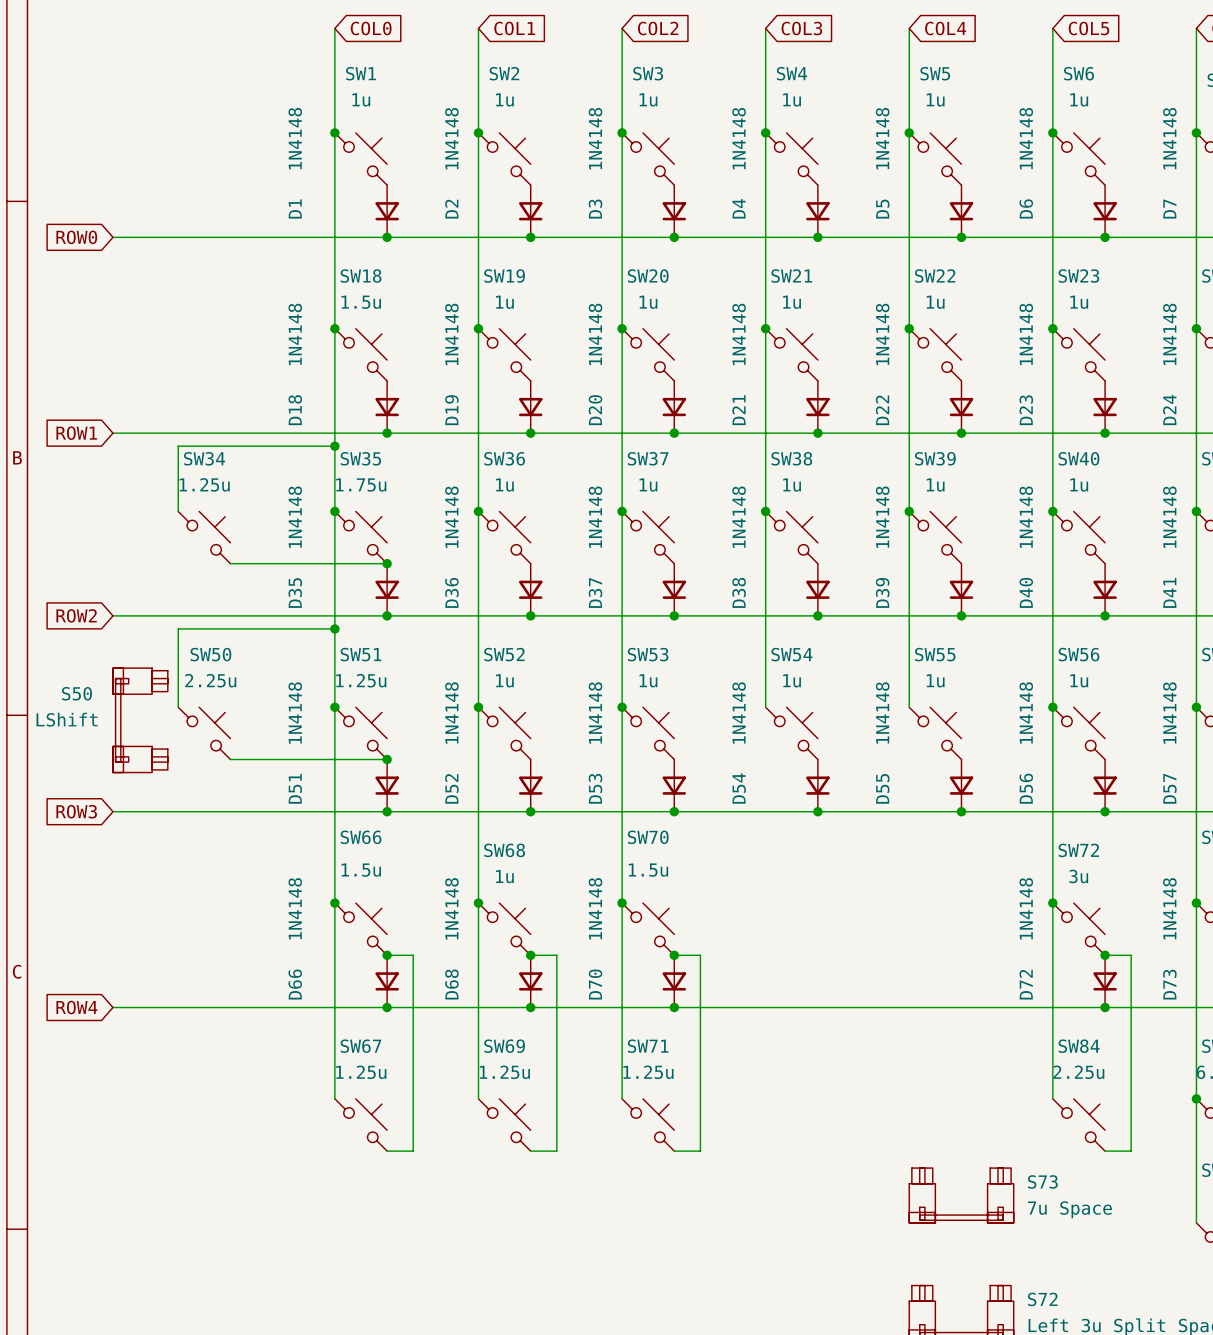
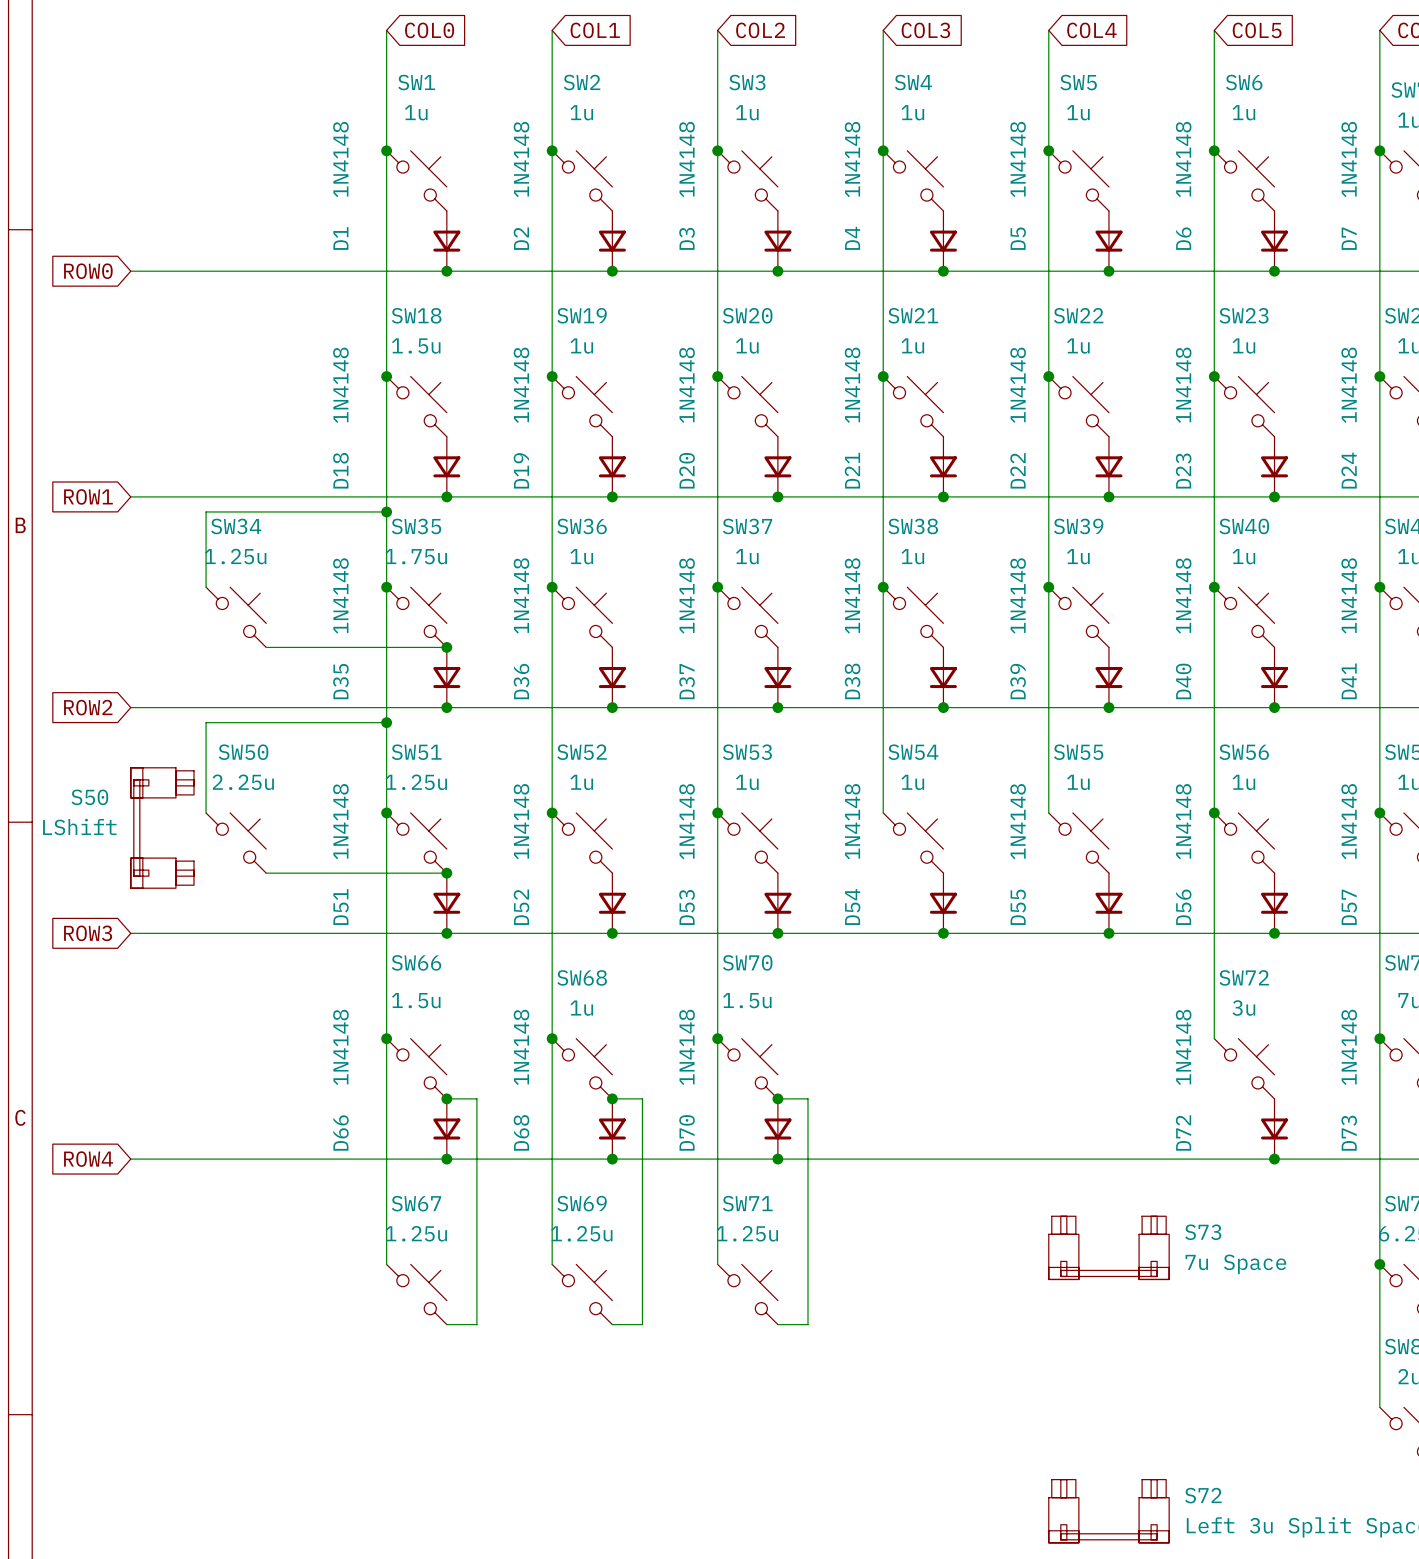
wire: (1052, 903) (1052, 1098) -> none
junction: (1052, 903) -> none
wire: (1105, 955) (1131, 955) (1131, 1151) (1105, 1151) -> none
junction: (1105, 955) -> none
SW84: 2.25u (1078, 1124) -> none
S73 position: (961, 1195) -> (1108, 1247)

